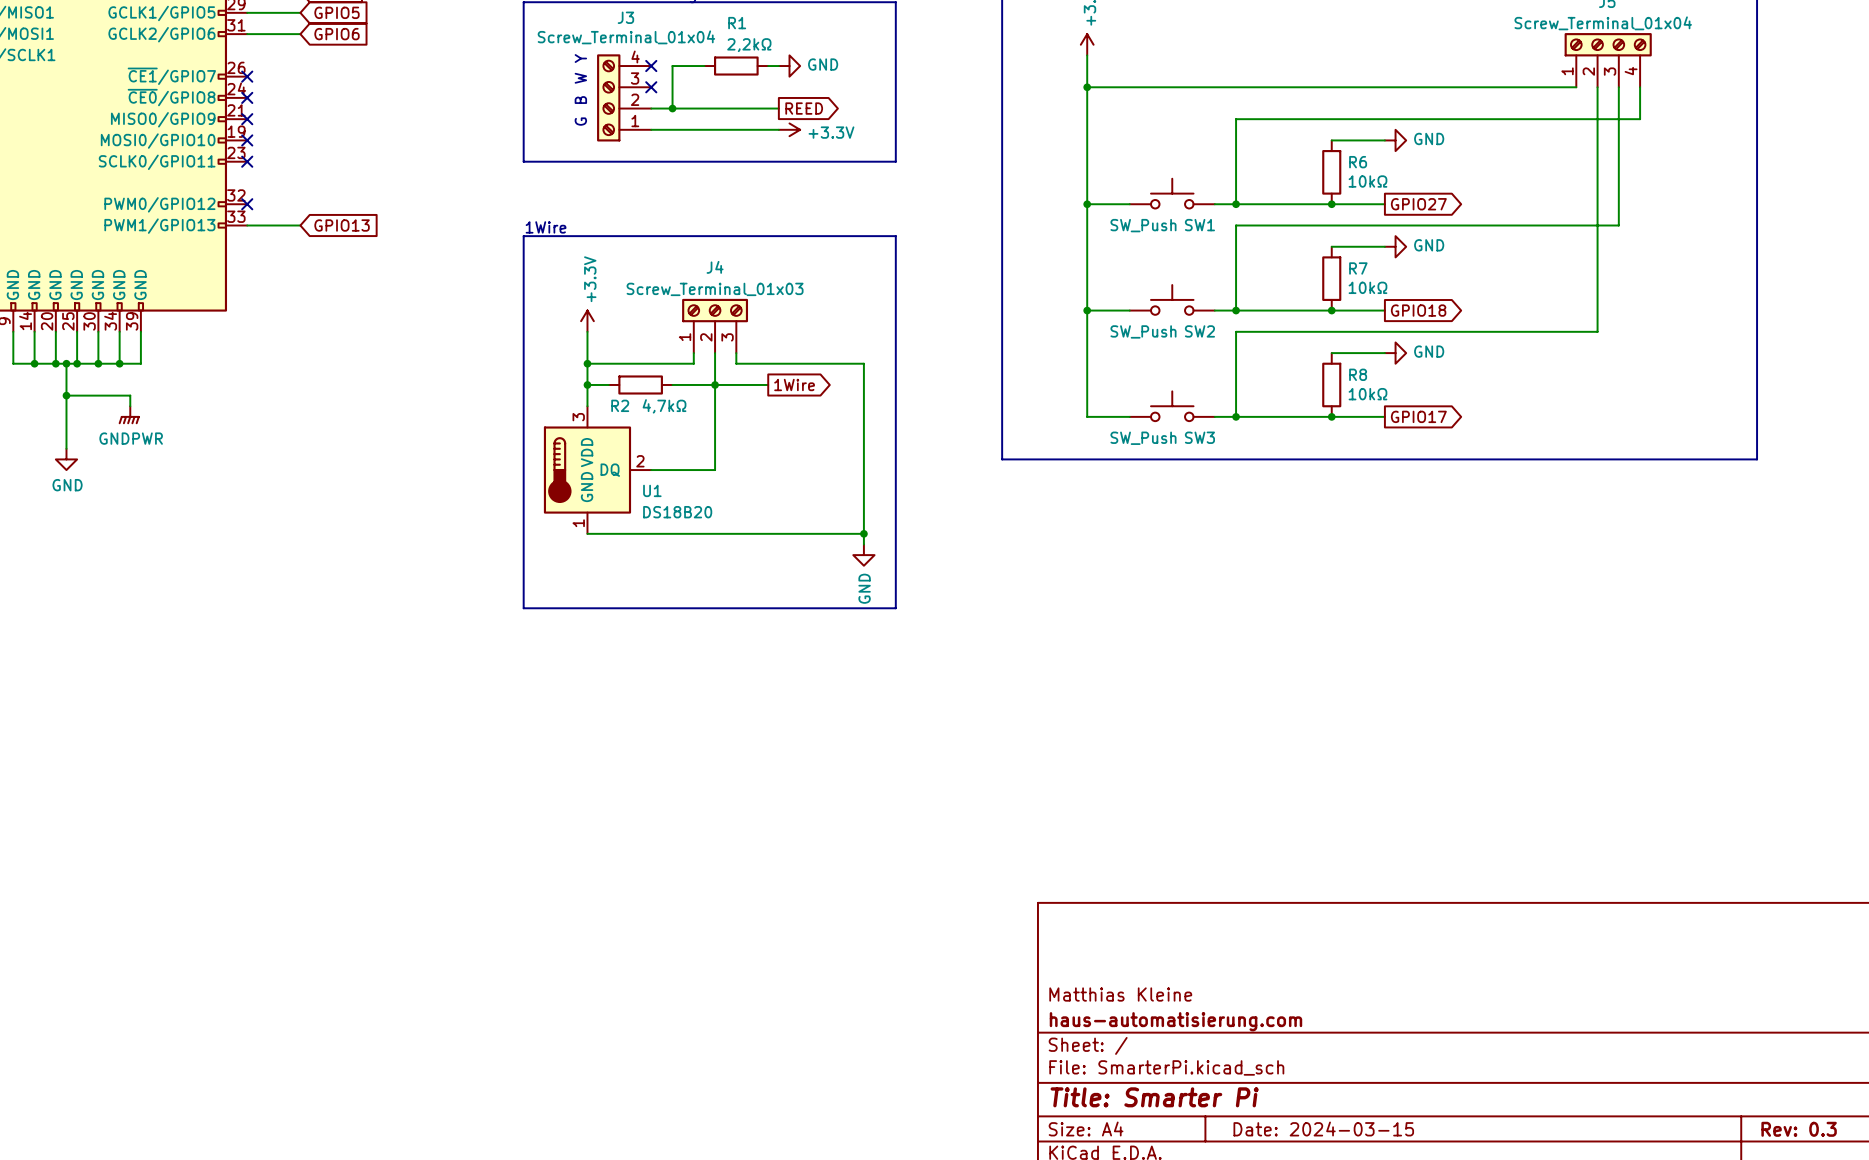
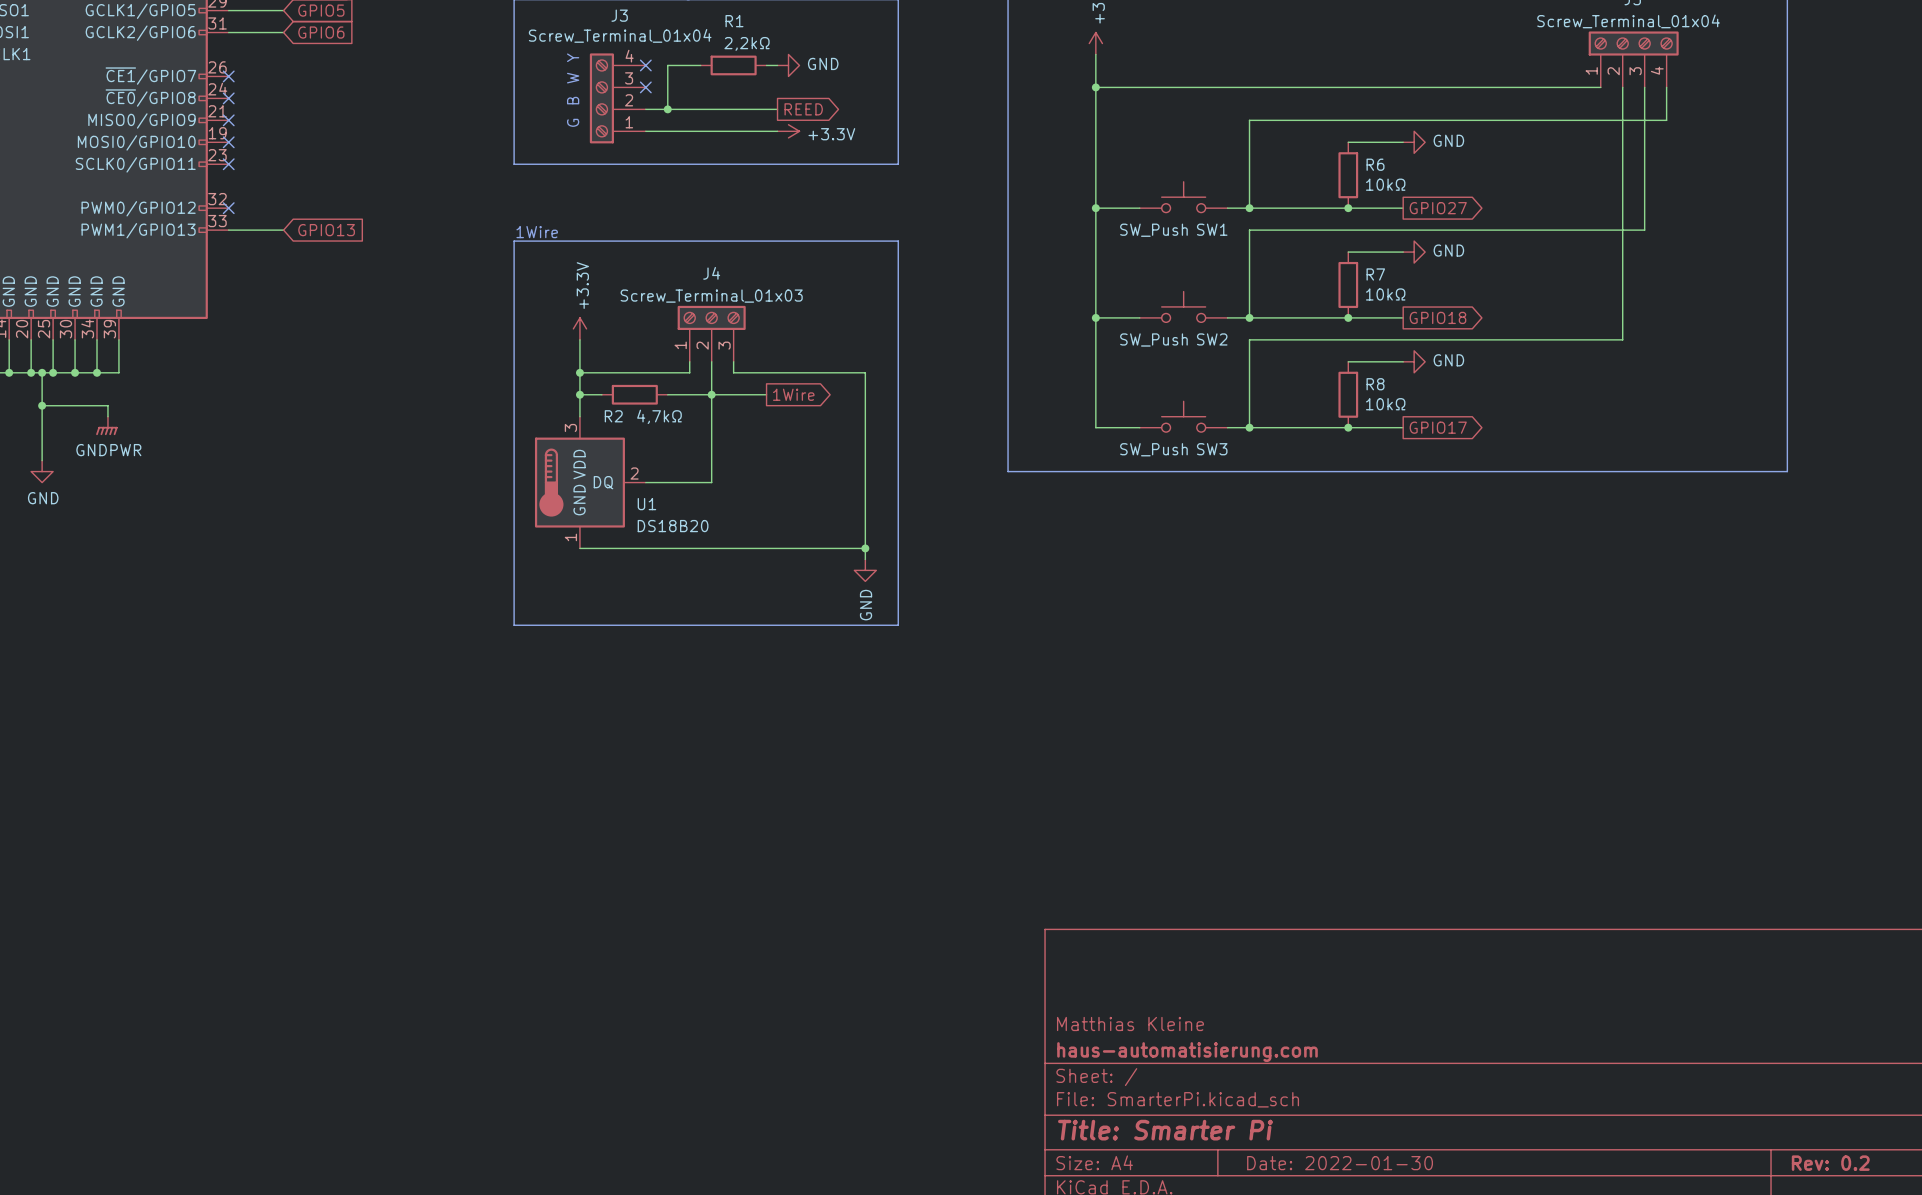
title block: Date: 2024-03-15 (1323, 1129) -> Date: 2022-01-30 (1340, 1163)
title block: Rev: 0.3 (1799, 1129) -> Rev: 0.2 (1830, 1163)

